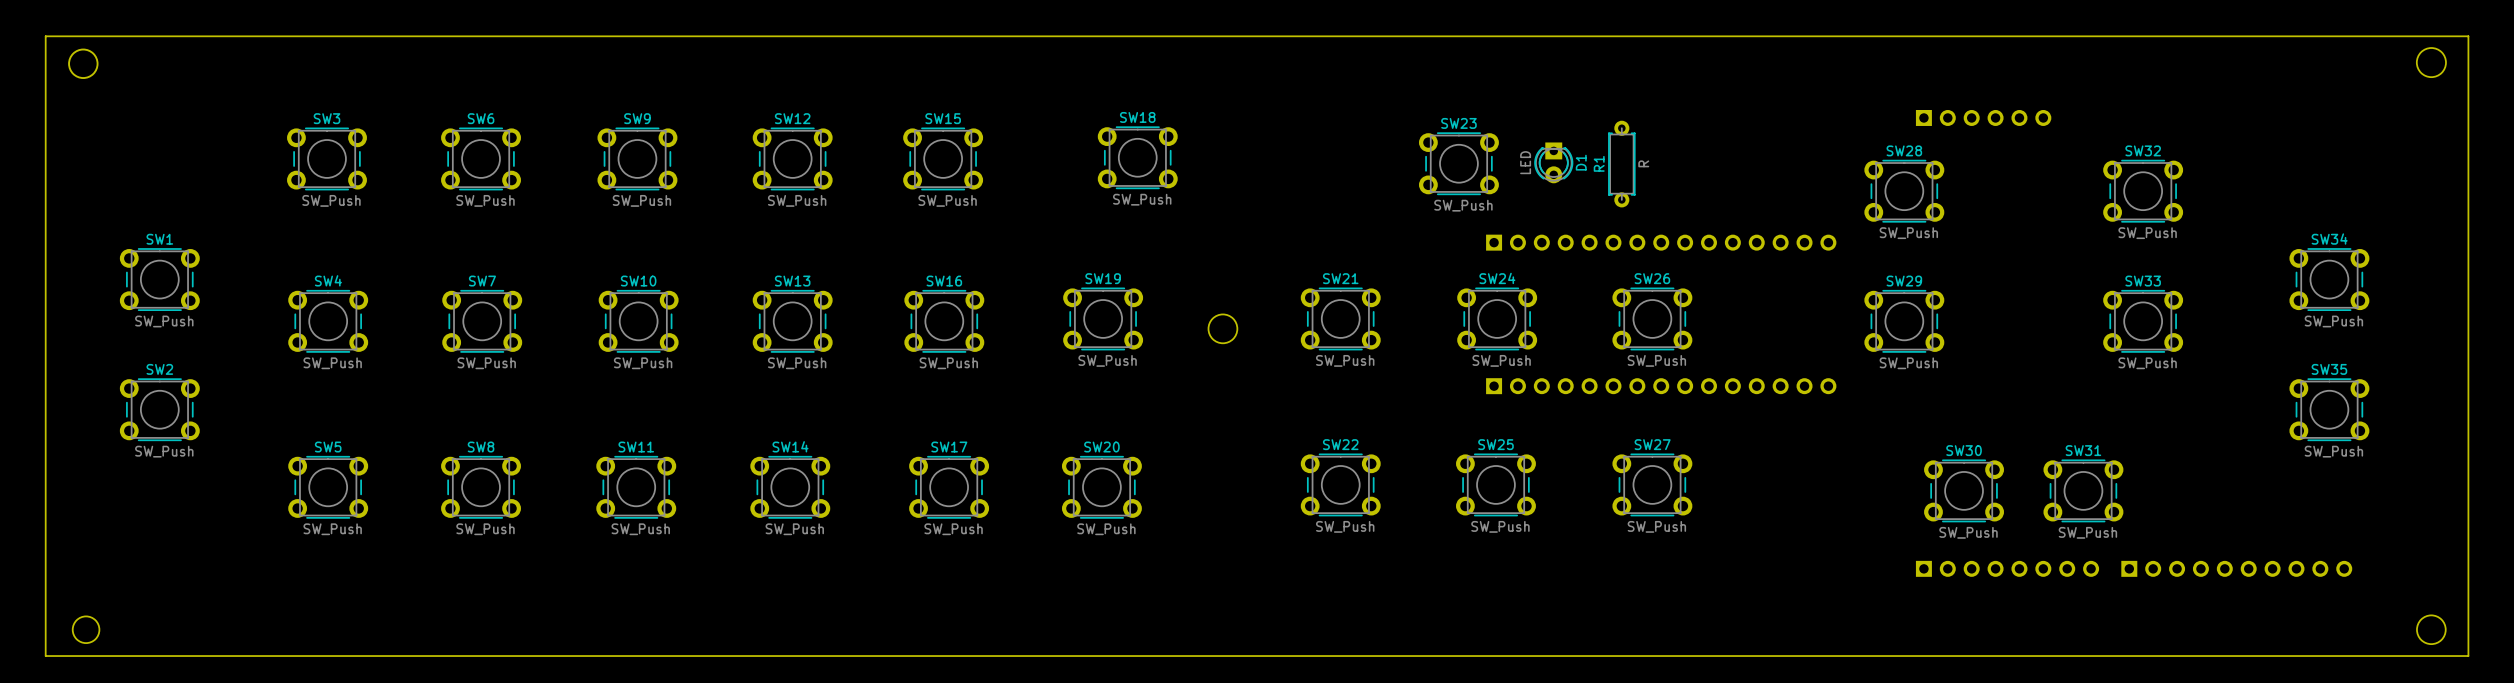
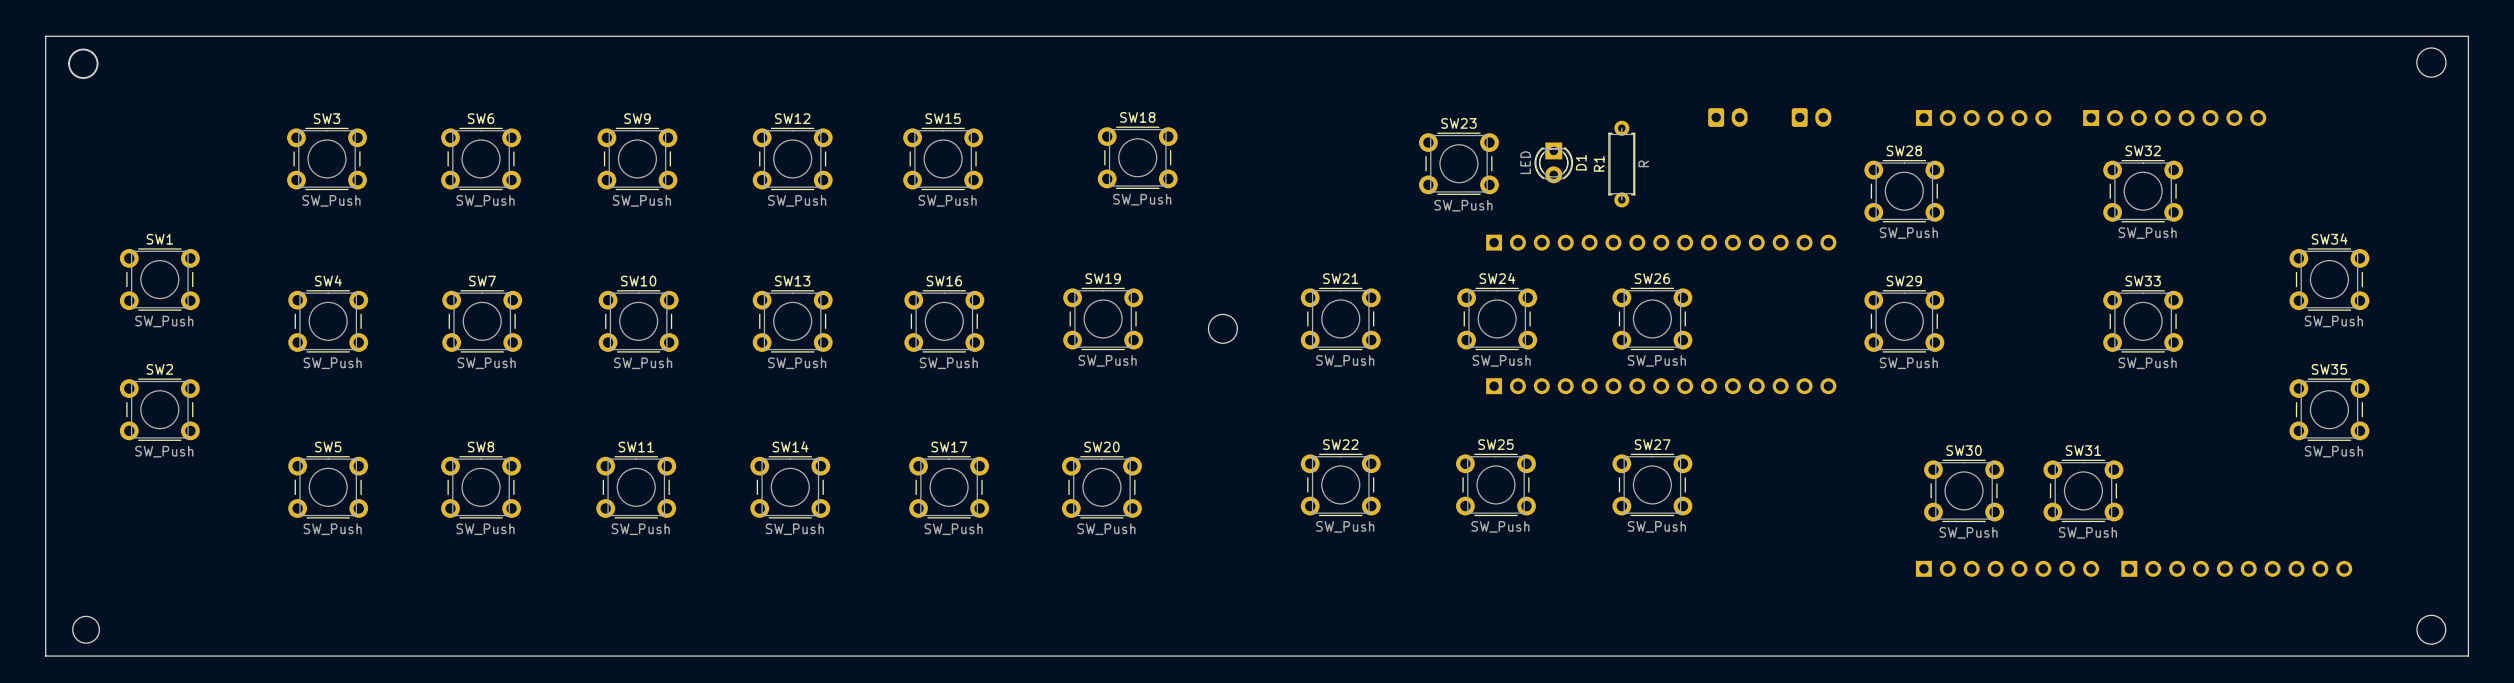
part: none -> (1727, 117)
part: none -> (1811, 117)
part: none -> (2174, 117)

